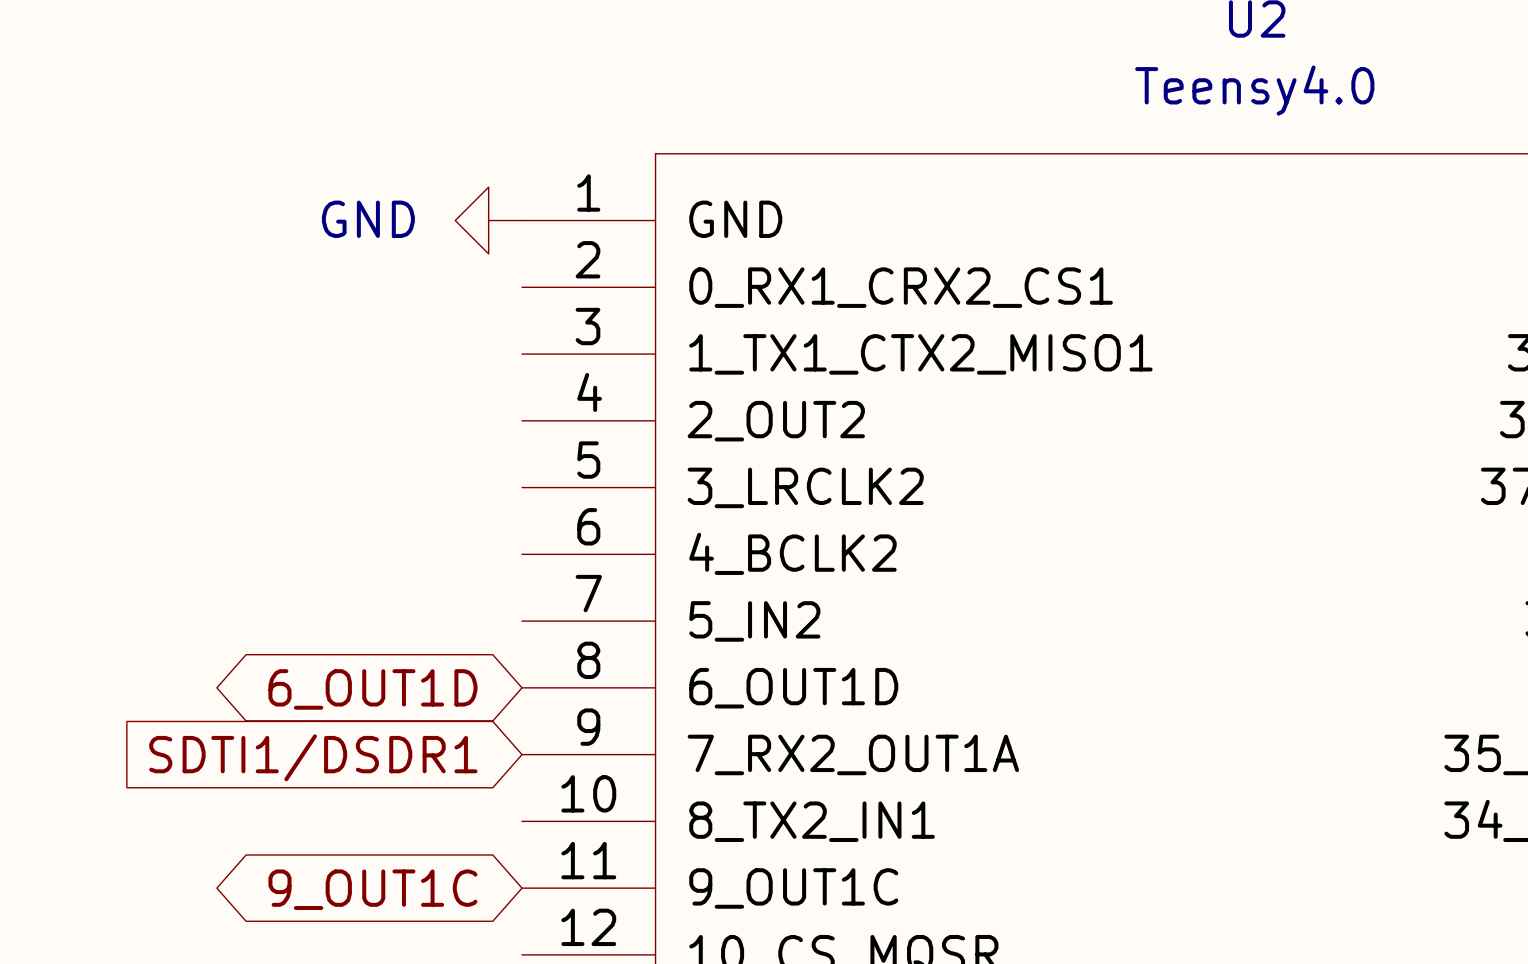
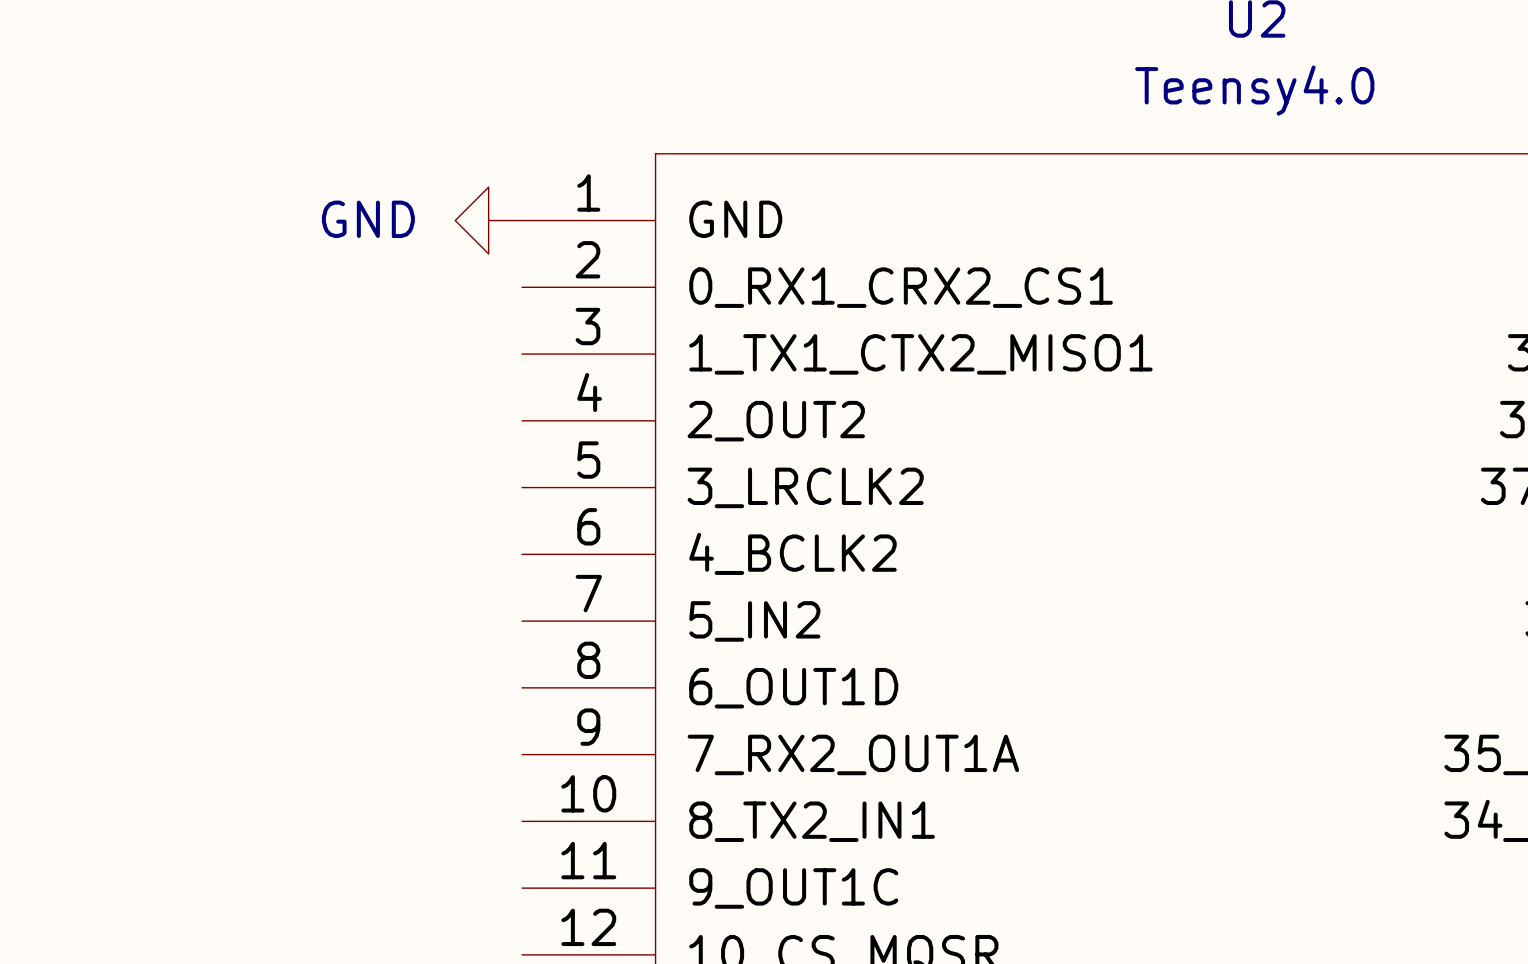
global label: 6_OUT1D (372, 689) -> none
global label: SDTI1/DSDR1 (313, 757) -> none
global label: 9_OUT1C (372, 889) -> none

